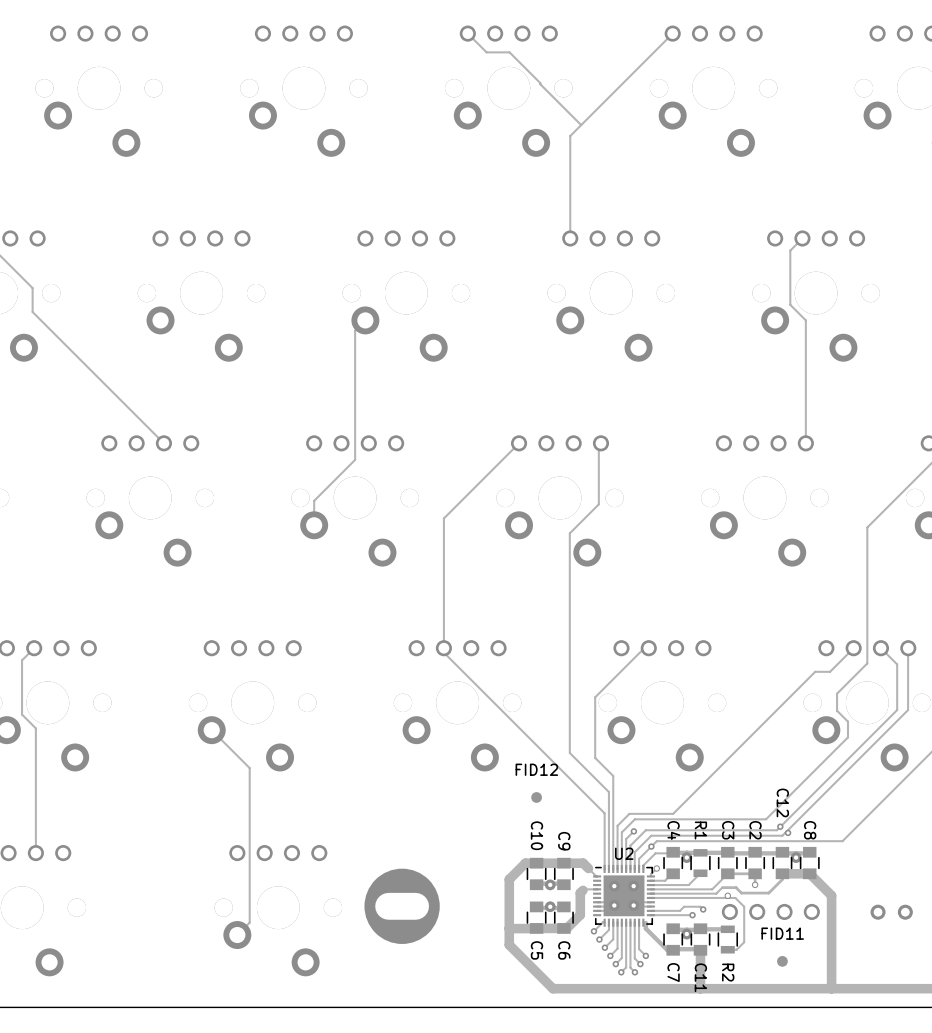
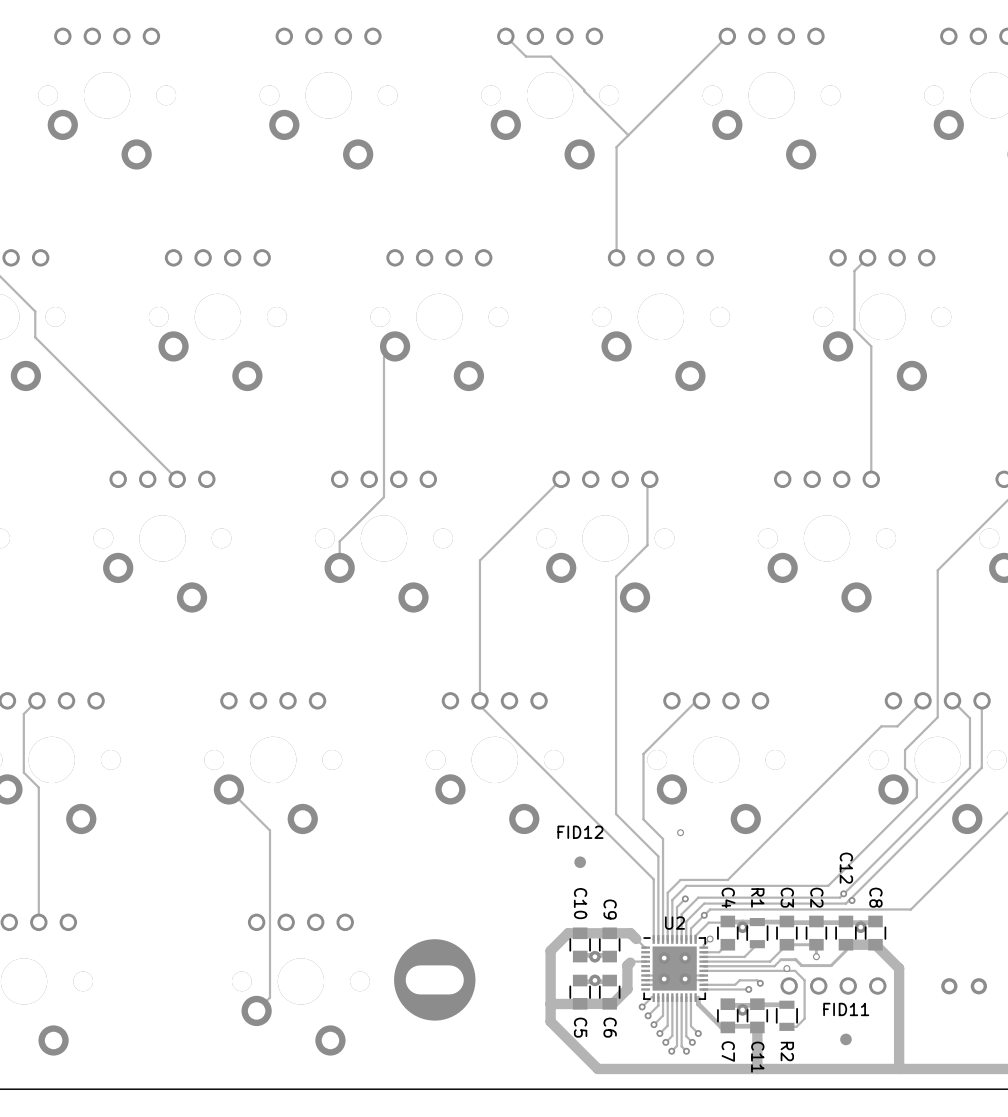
via: none -> (680, 832)

